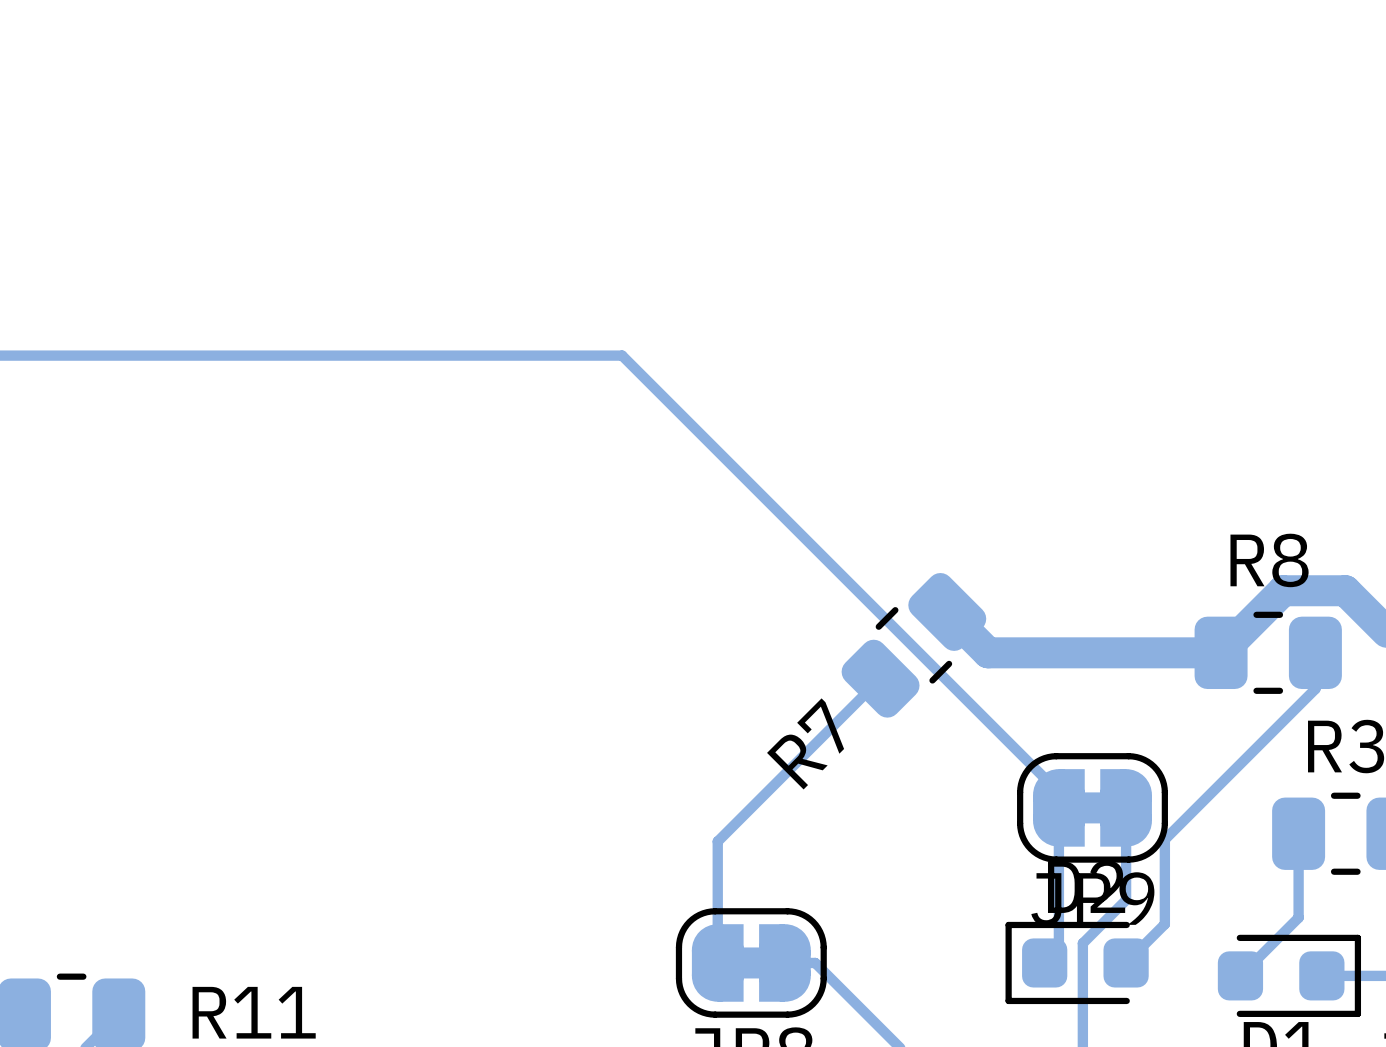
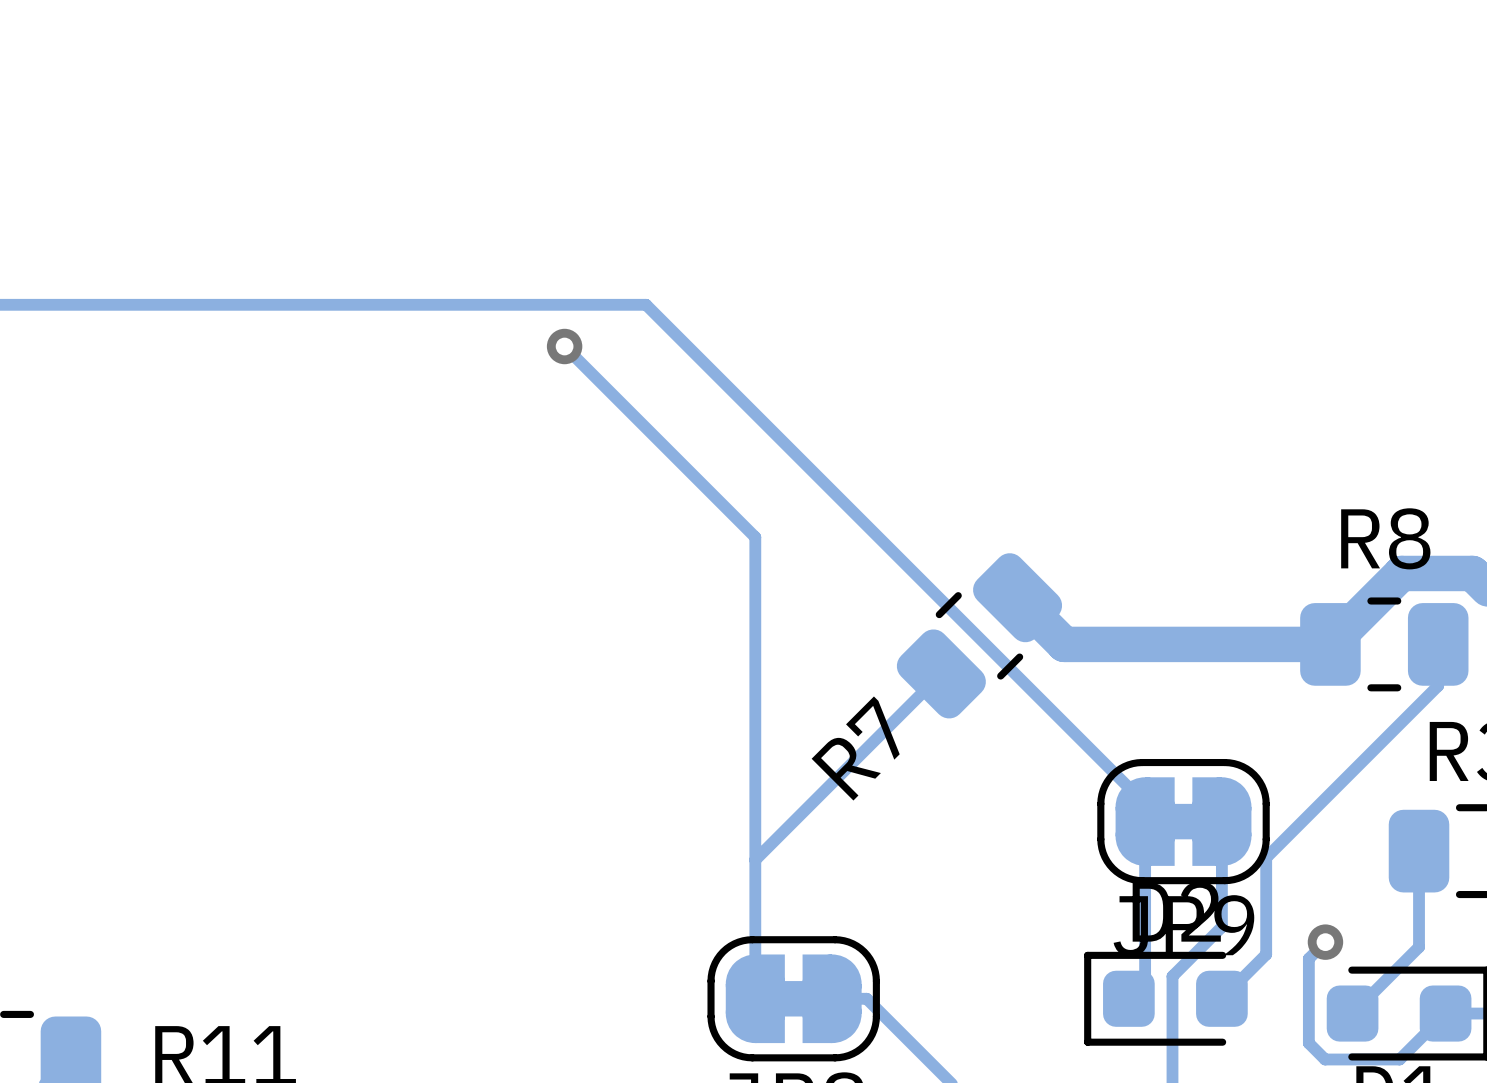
track: none -> (564, 346) (755, 537) (755, 859)
via: none -> (564, 346)
track: none -> (1325, 942) (1308, 958) (1308, 1043) (1325, 1059) (1399, 1059) (1445, 1013)
via: none -> (1325, 942)

